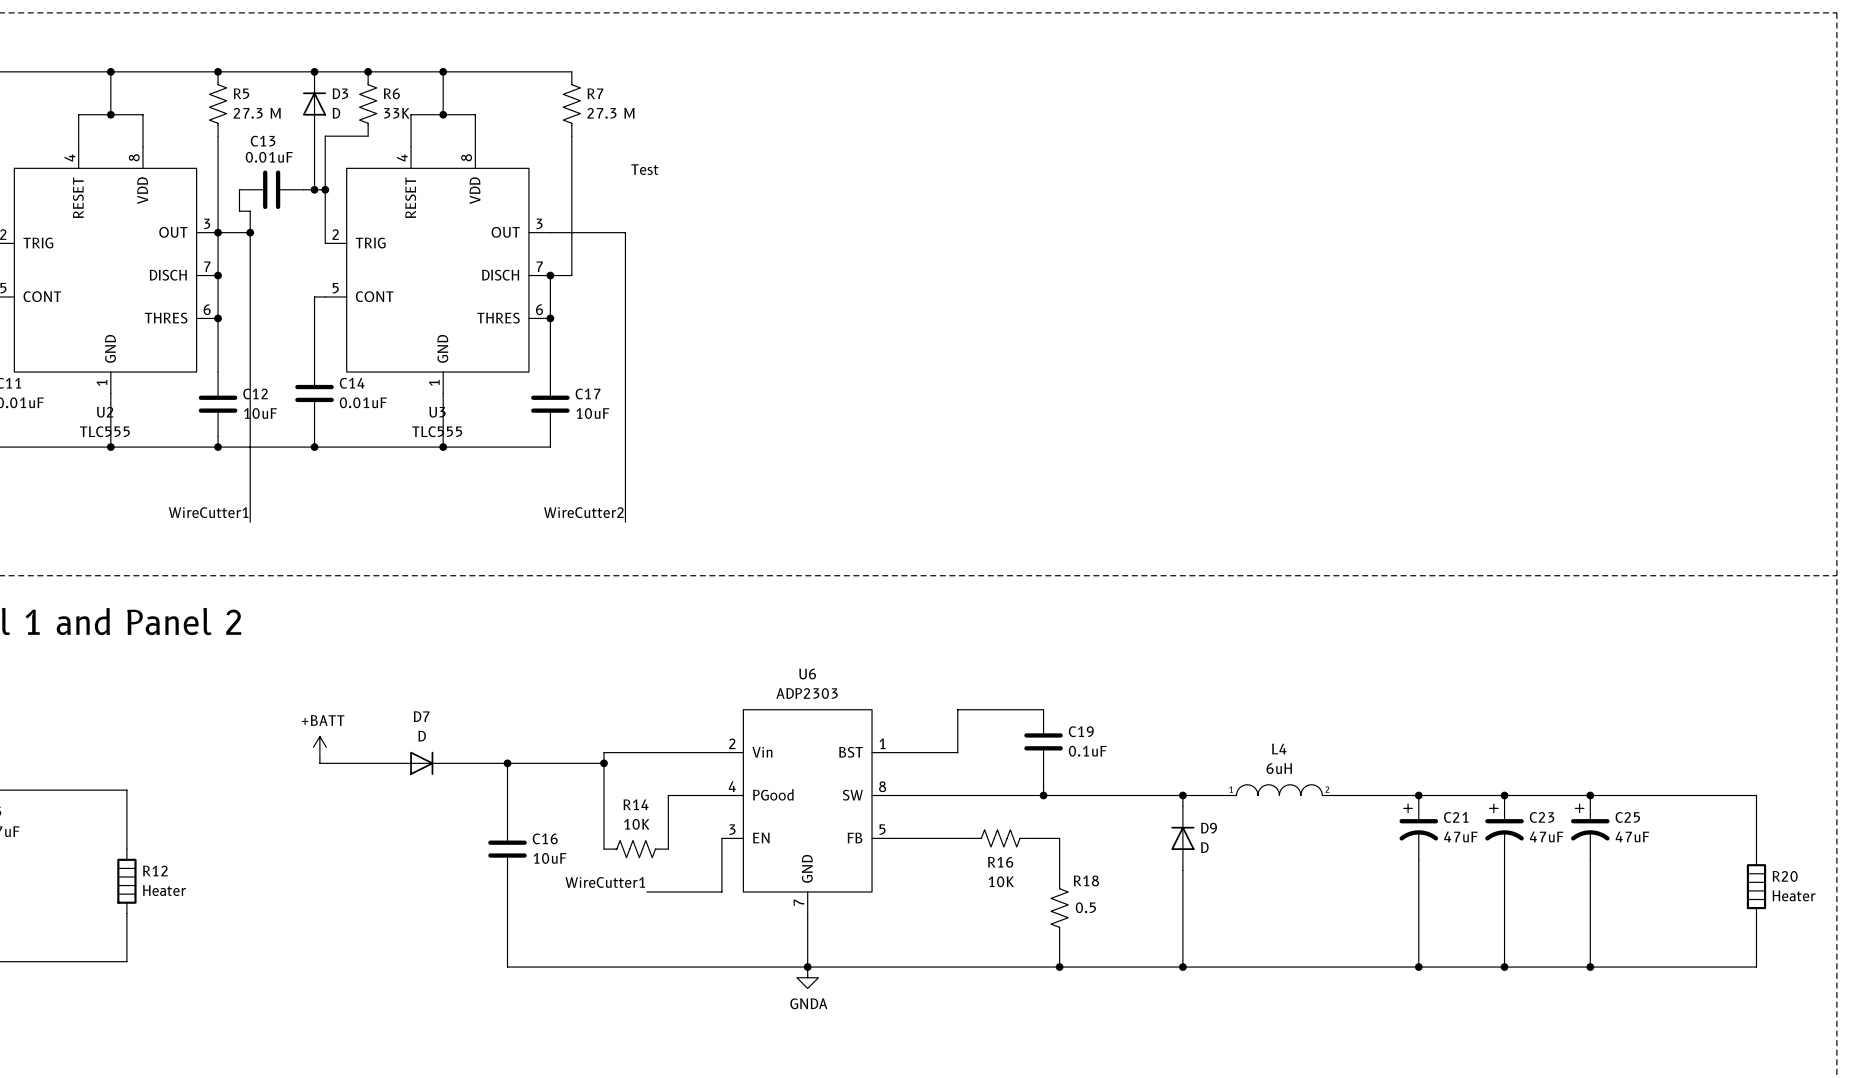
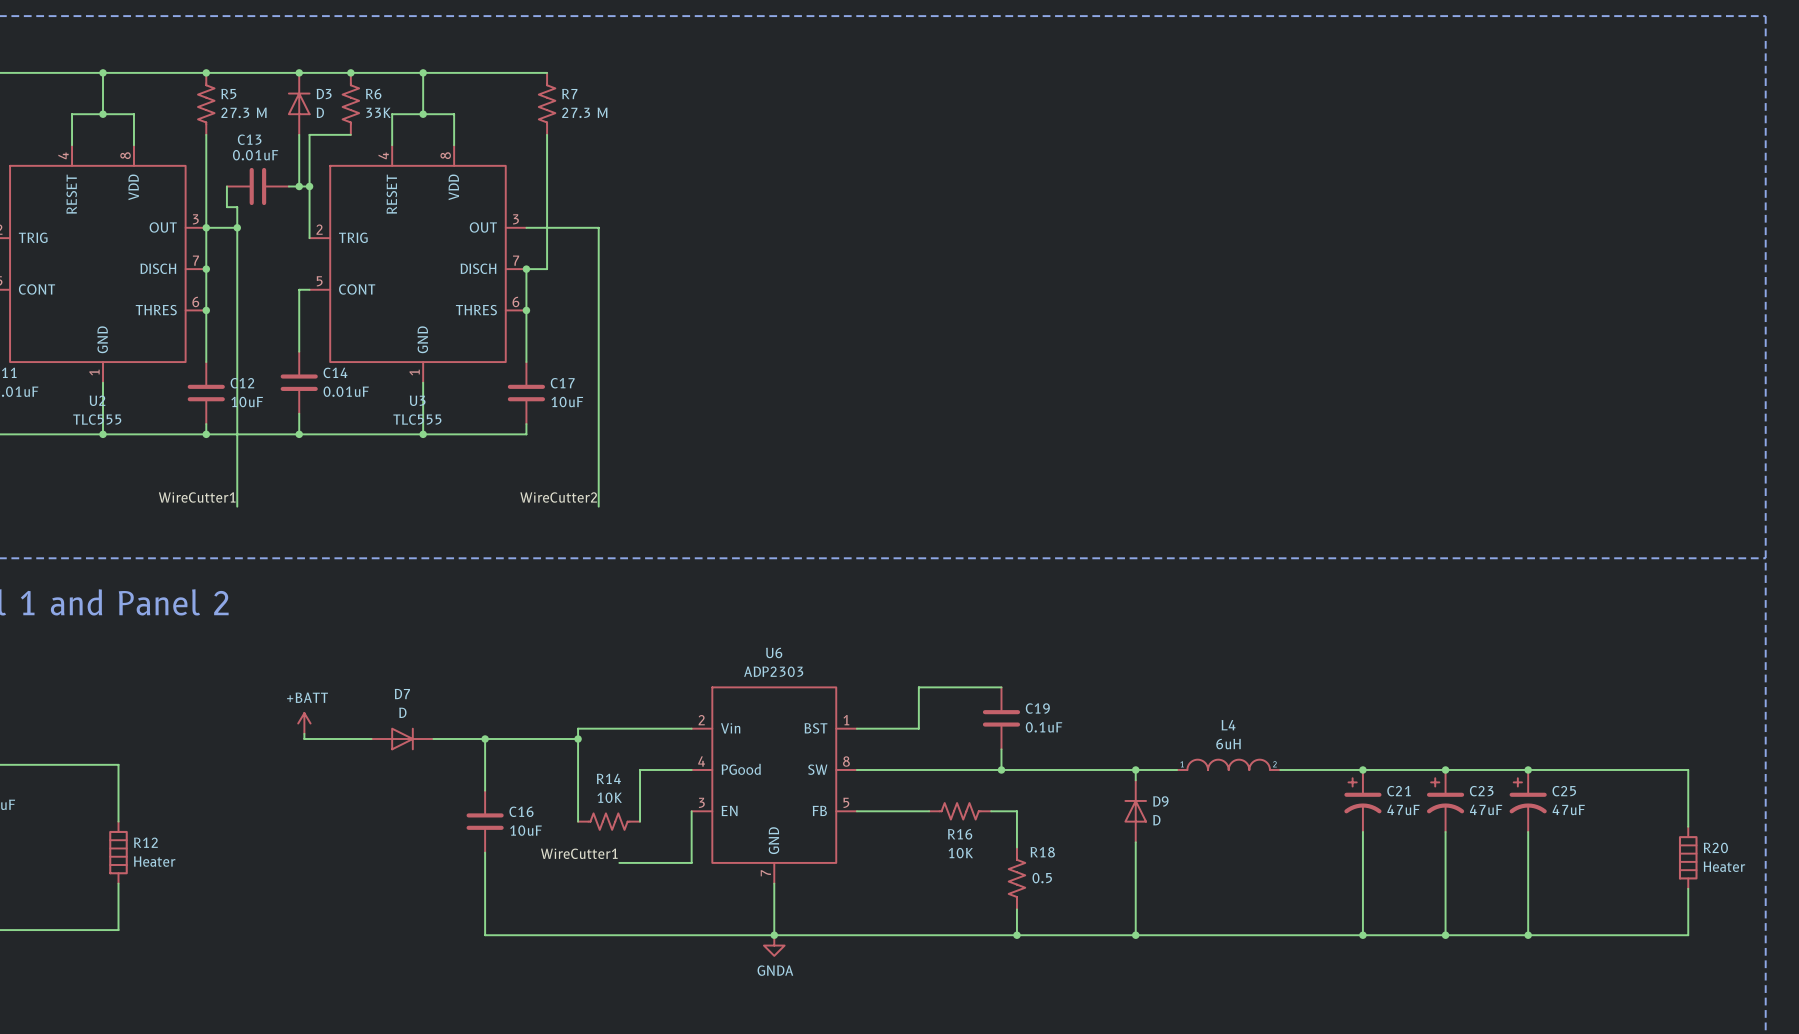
label: Test (644, 169) -> none

